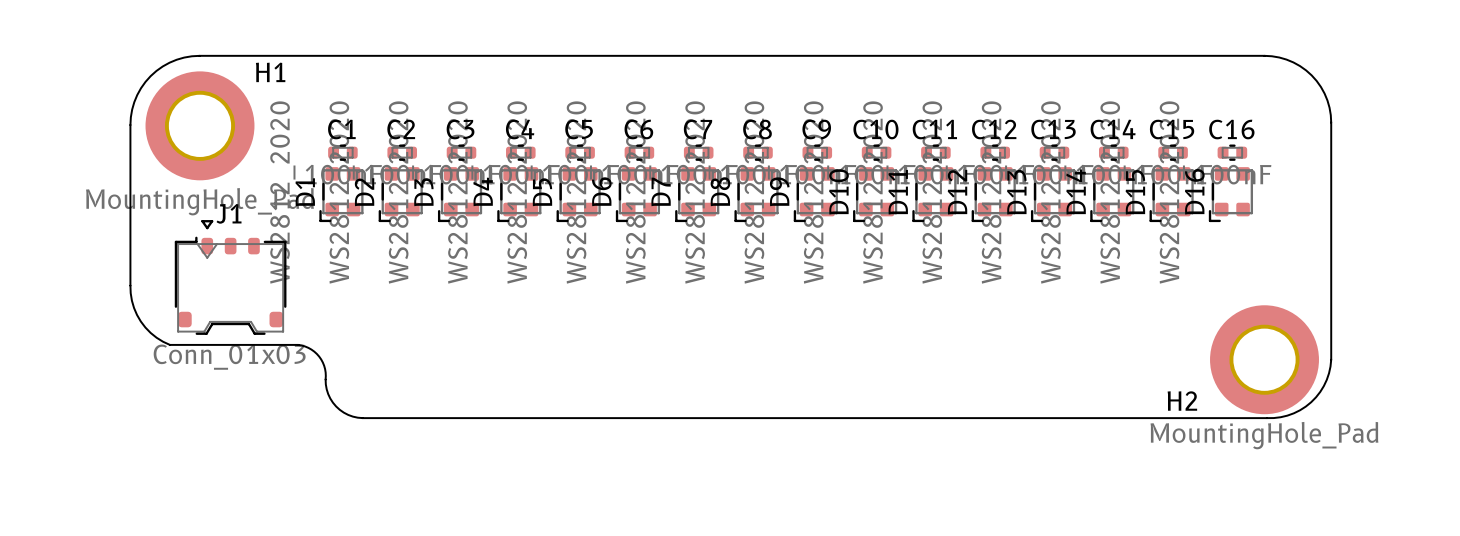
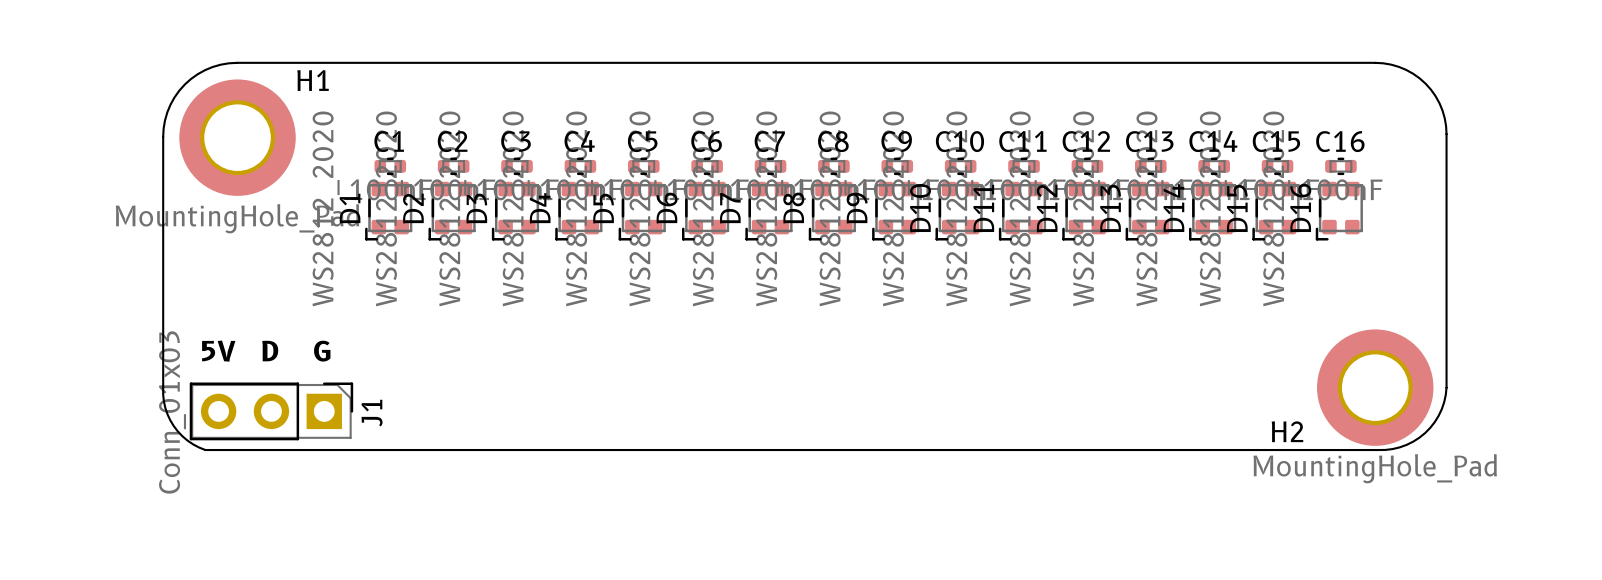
J1 name position: J1 (229, 213) -> J1 (372, 413)
J1 footprint: [174, 220, 287, 335] -> [189, 382, 354, 441]
board edge: (130, 285) (131, 300) (140, 321) (156, 337) (169, 344) (298, 344) (311, 349) (319, 356) (324, 365) (326, 389) (332, 402) (343, 412) (362, 418) -> (163, 308) (163, 394) (165, 407) (173, 426) (193, 444) (205, 450) (411, 450)
text: none -> 5V (218, 351)
text: none -> D (270, 351)
text: none -> G (322, 351)
J1 value position: Conn_01x03 (229, 357) -> Conn_01x03 (172, 412)

